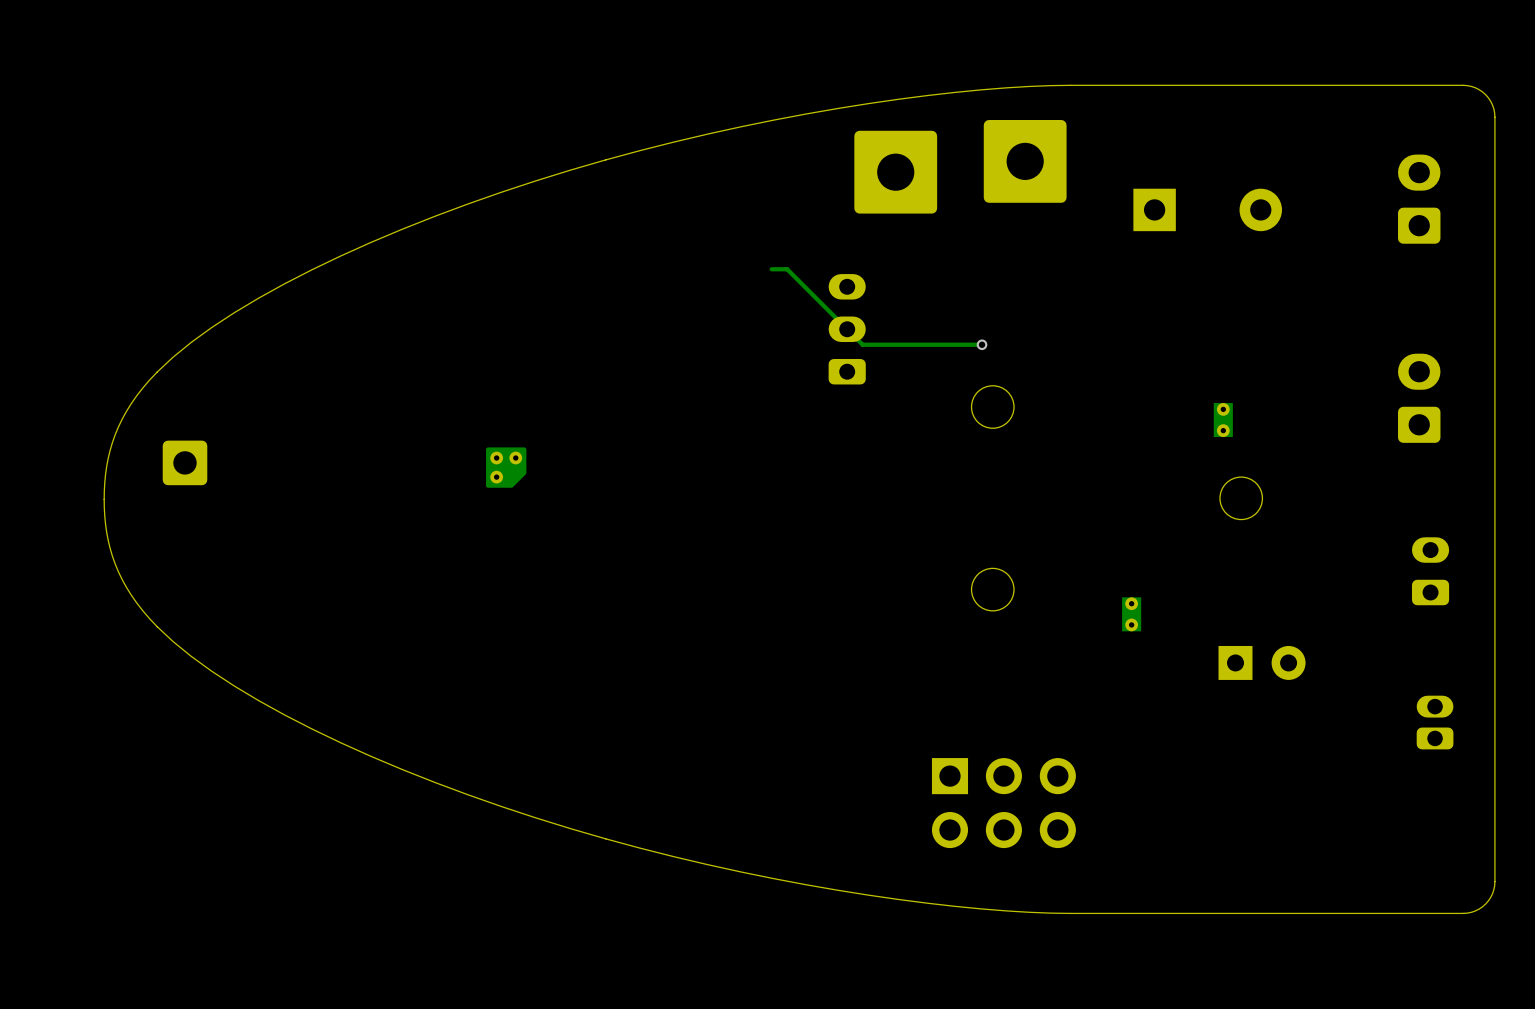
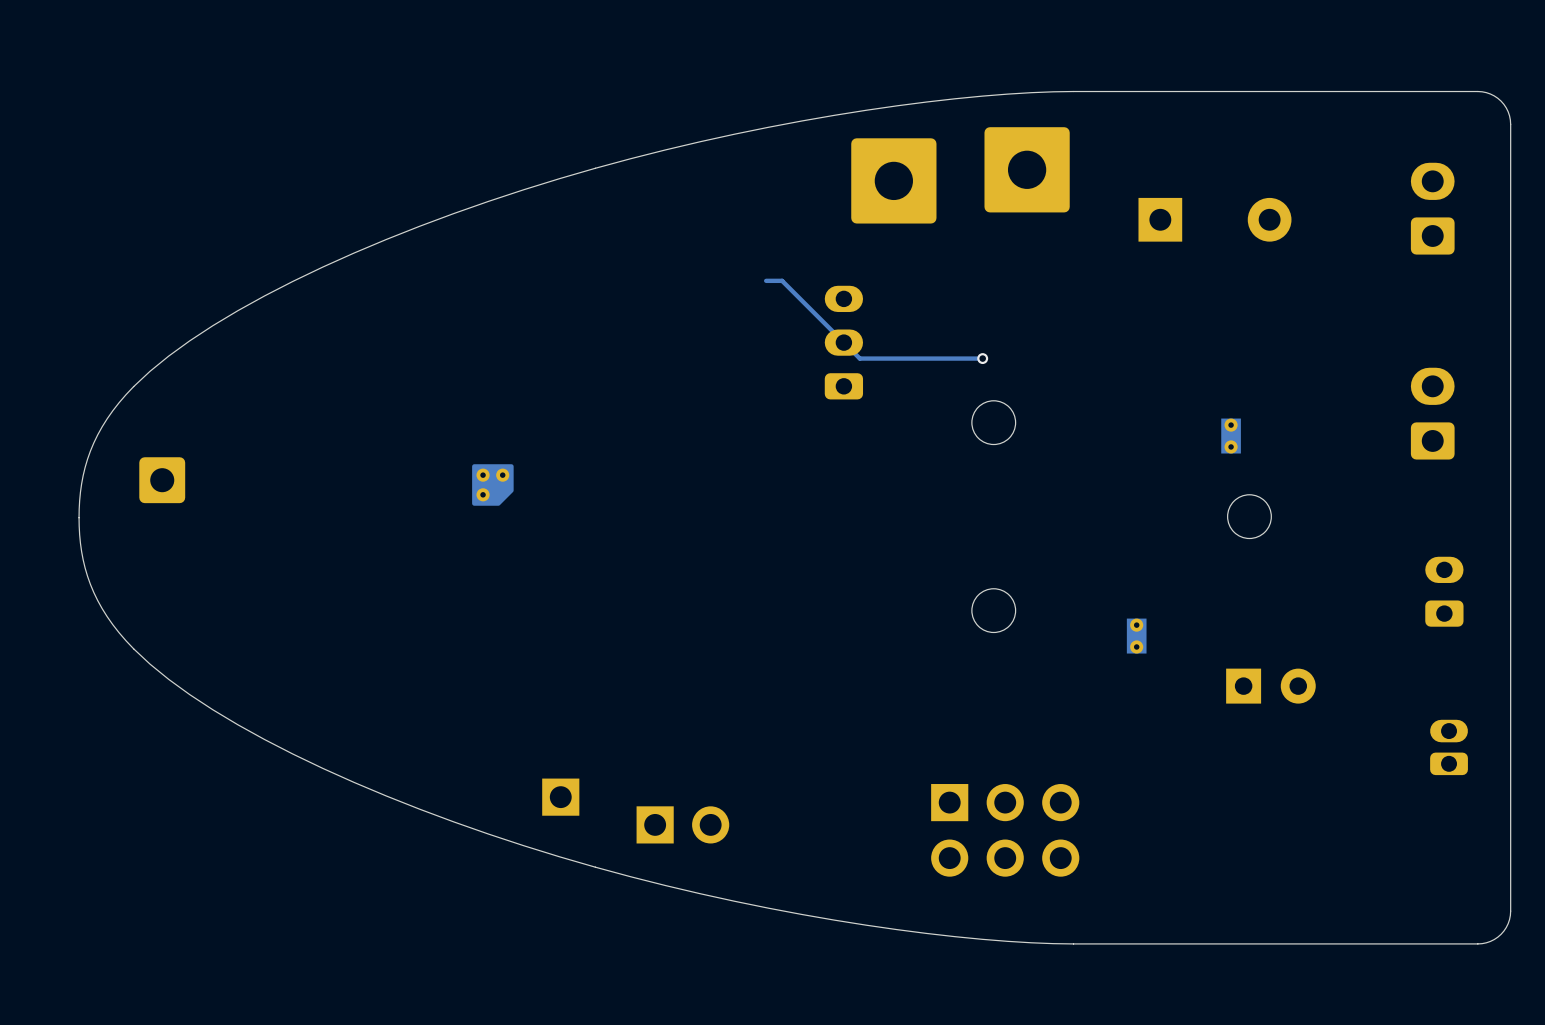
part: none -> (560, 797)
part: none -> (682, 824)

